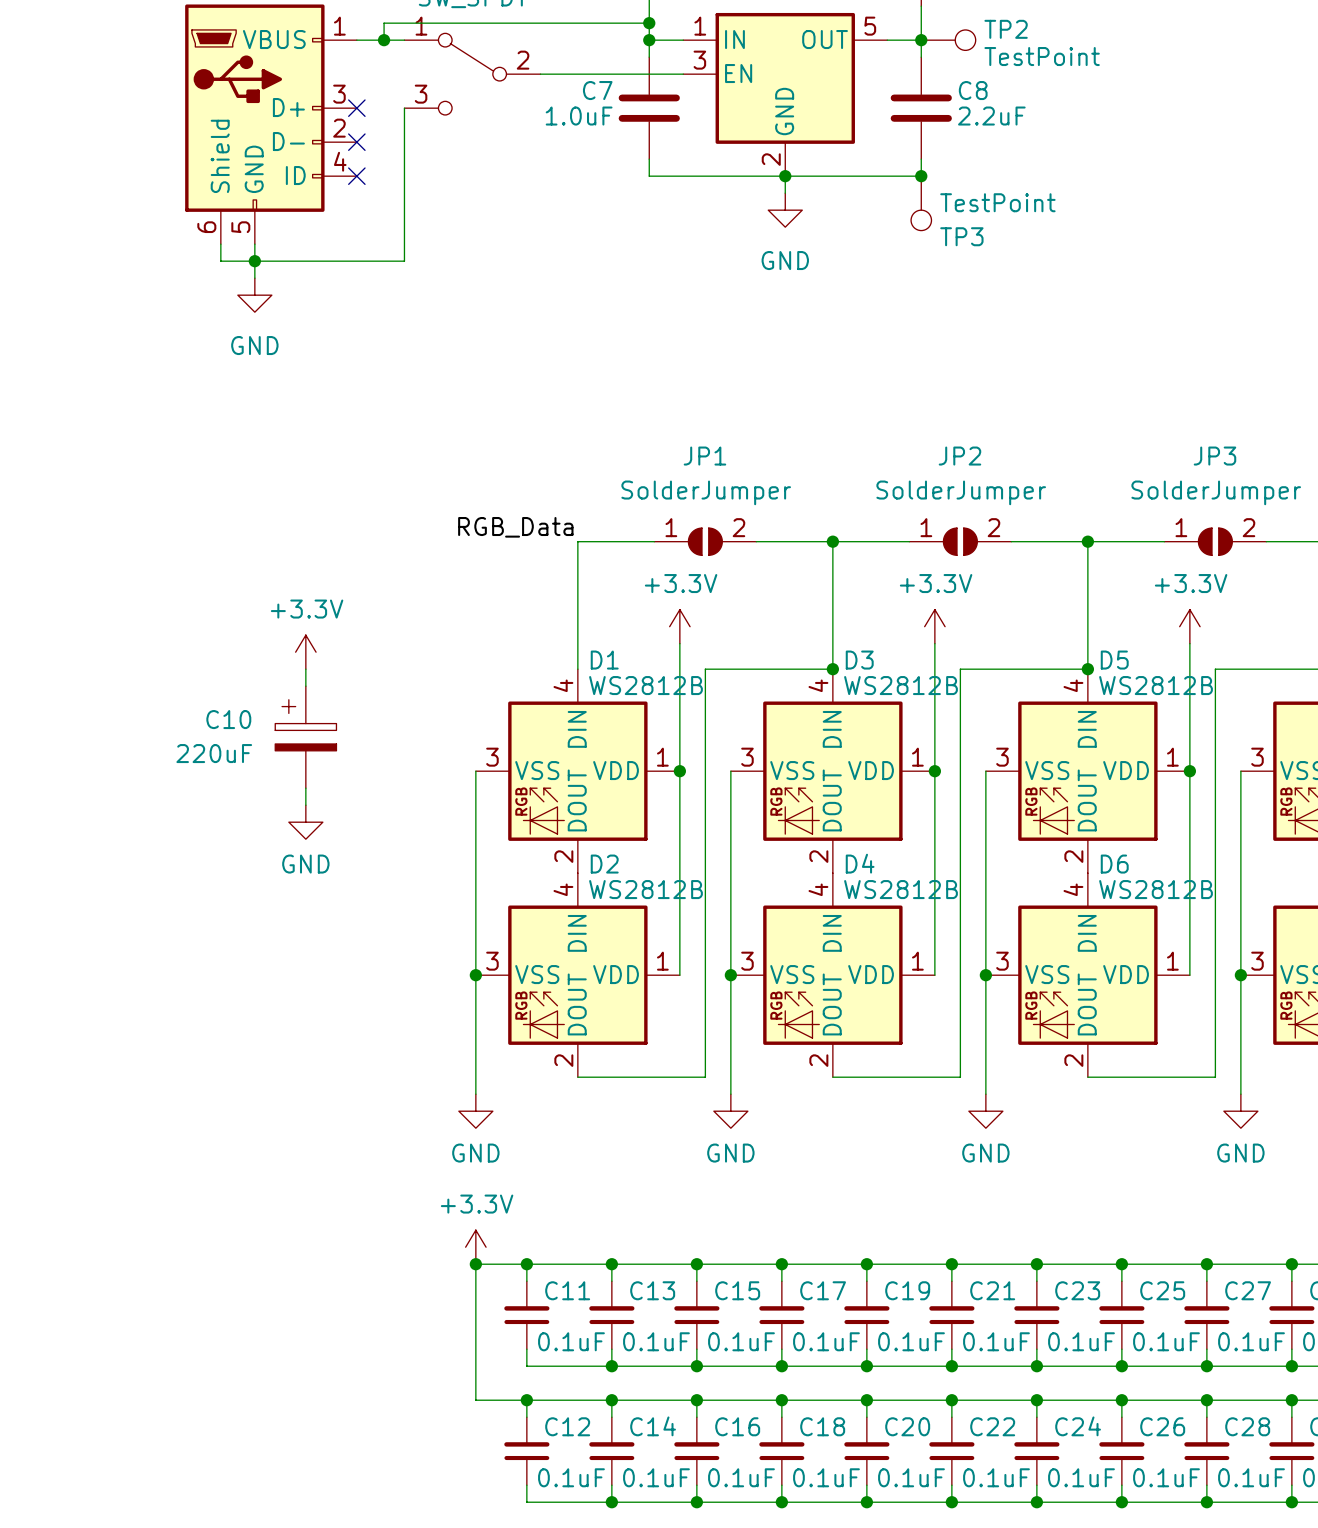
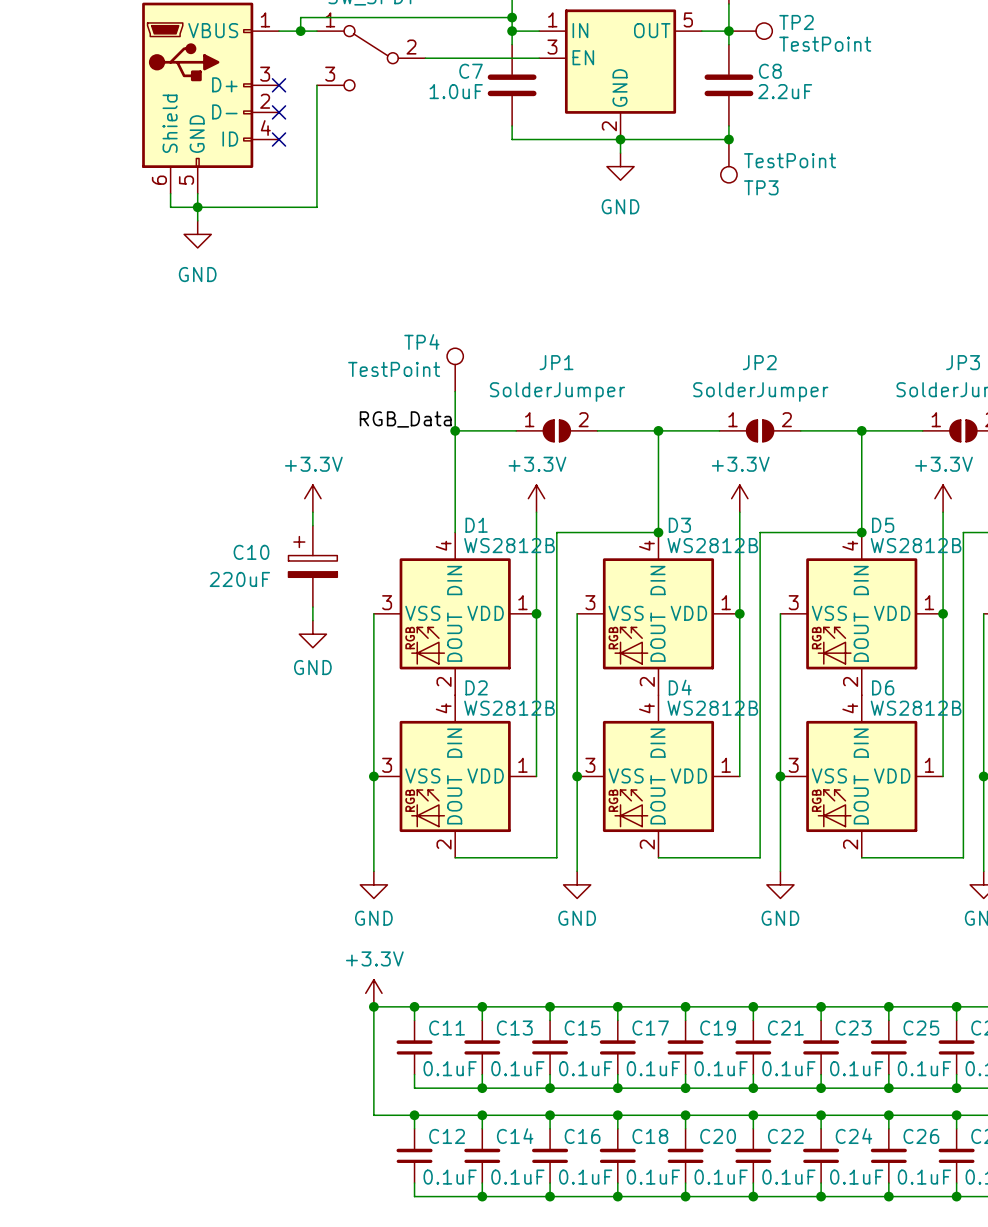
TP4: none -> TestPoint (455, 369)
wire: none -> (455, 391) (455, 430)
junction: none -> (455, 430)
power symbol position: +3.3V (305, 652) -> +3.3V (312, 498)
wire: (305, 669) (305, 686) -> (312, 512) (312, 525)
C10 position: (305, 737) -> (312, 566)
wire: (305, 788) (305, 805) -> (312, 607) (312, 620)
power symbol position: GND (305, 822) -> GND (312, 634)

